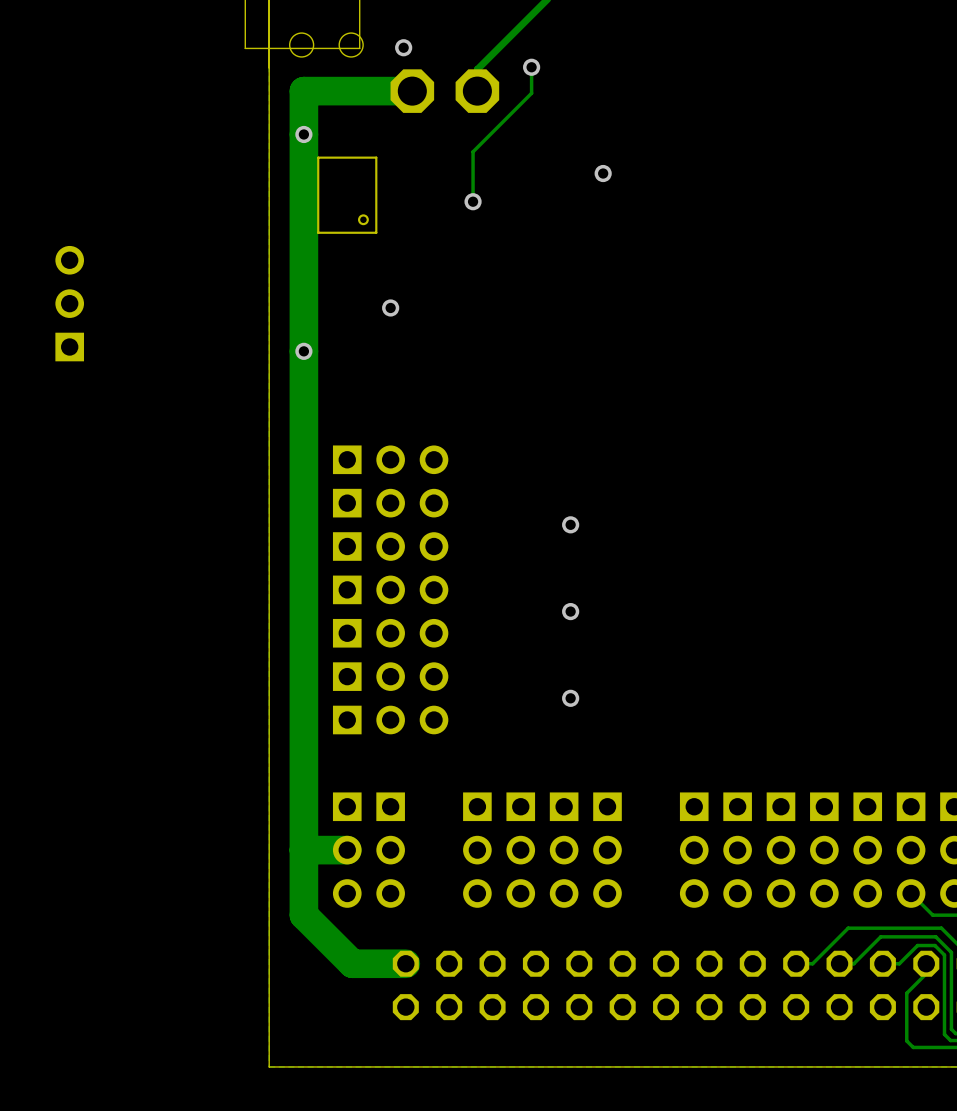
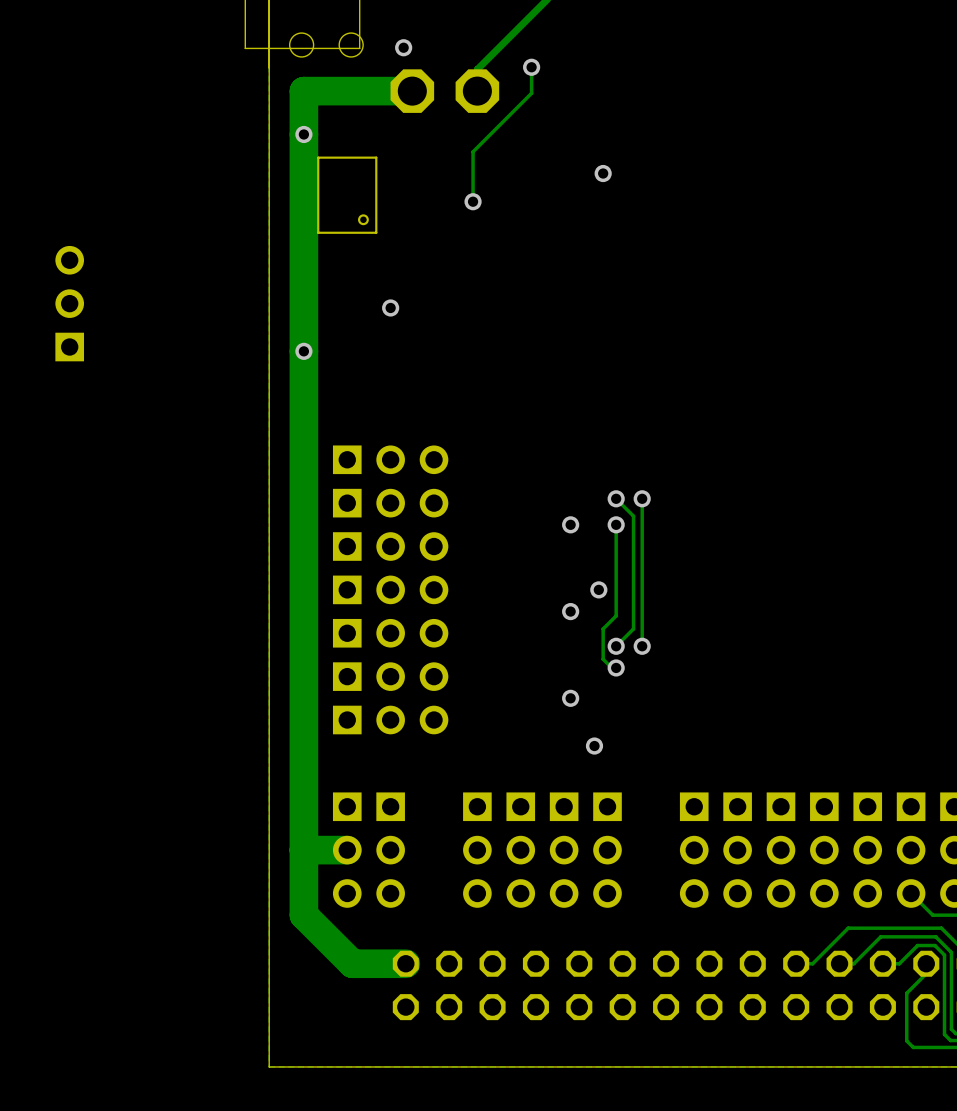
track: none -> (616, 498) (633, 516) (633, 628) (616, 646)
via: none -> (616, 498)
track: none -> (642, 498) (642, 646)
via: none -> (642, 498)
track: none -> (616, 524) (616, 615) (603, 628) (603, 659) (611, 667) (616, 667)
via: none -> (616, 524)
via: none -> (598, 589)
via: none -> (616, 646)
via: none -> (642, 646)
via: none -> (616, 667)
via: none -> (594, 746)

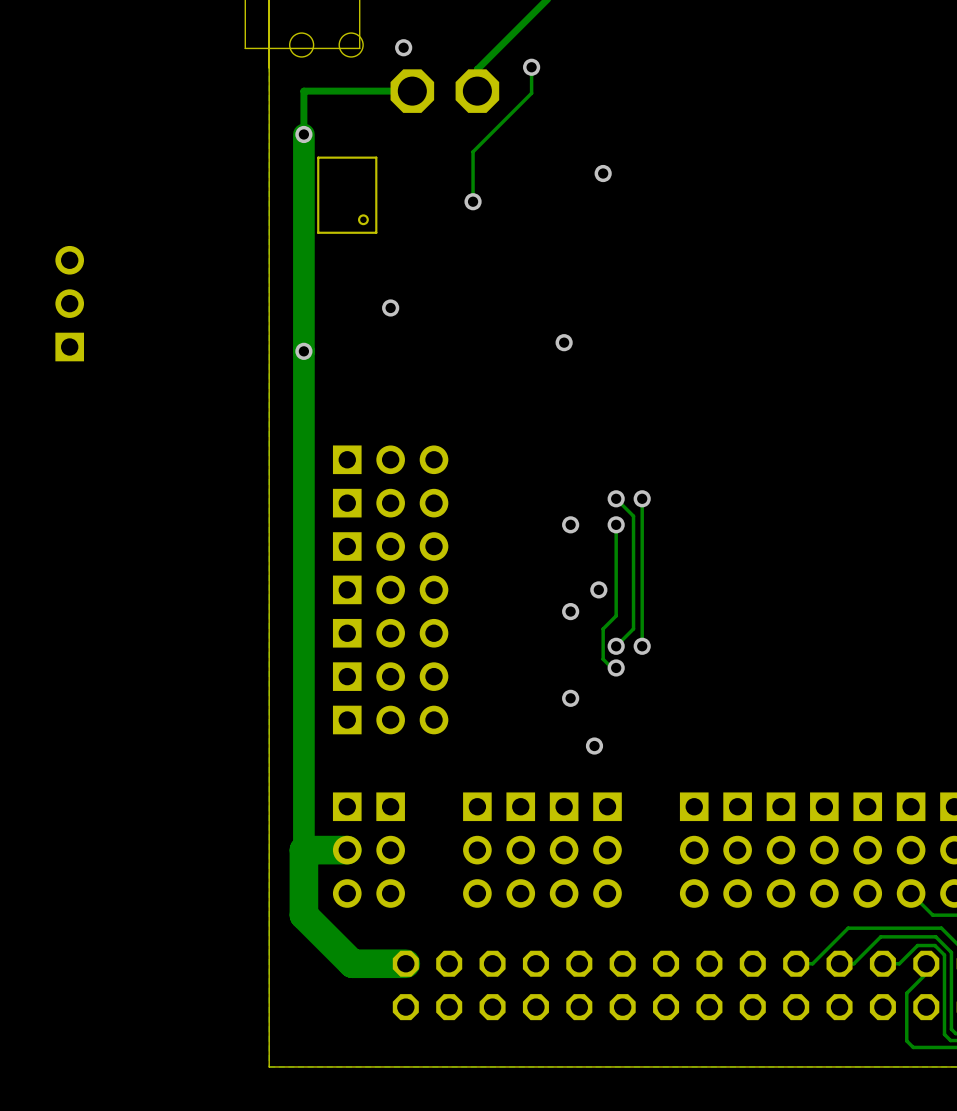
track width: thick (412, 91) (303, 91) (303, 850) -> thin (412, 91) (303, 91) (303, 850)
via: none -> (564, 342)

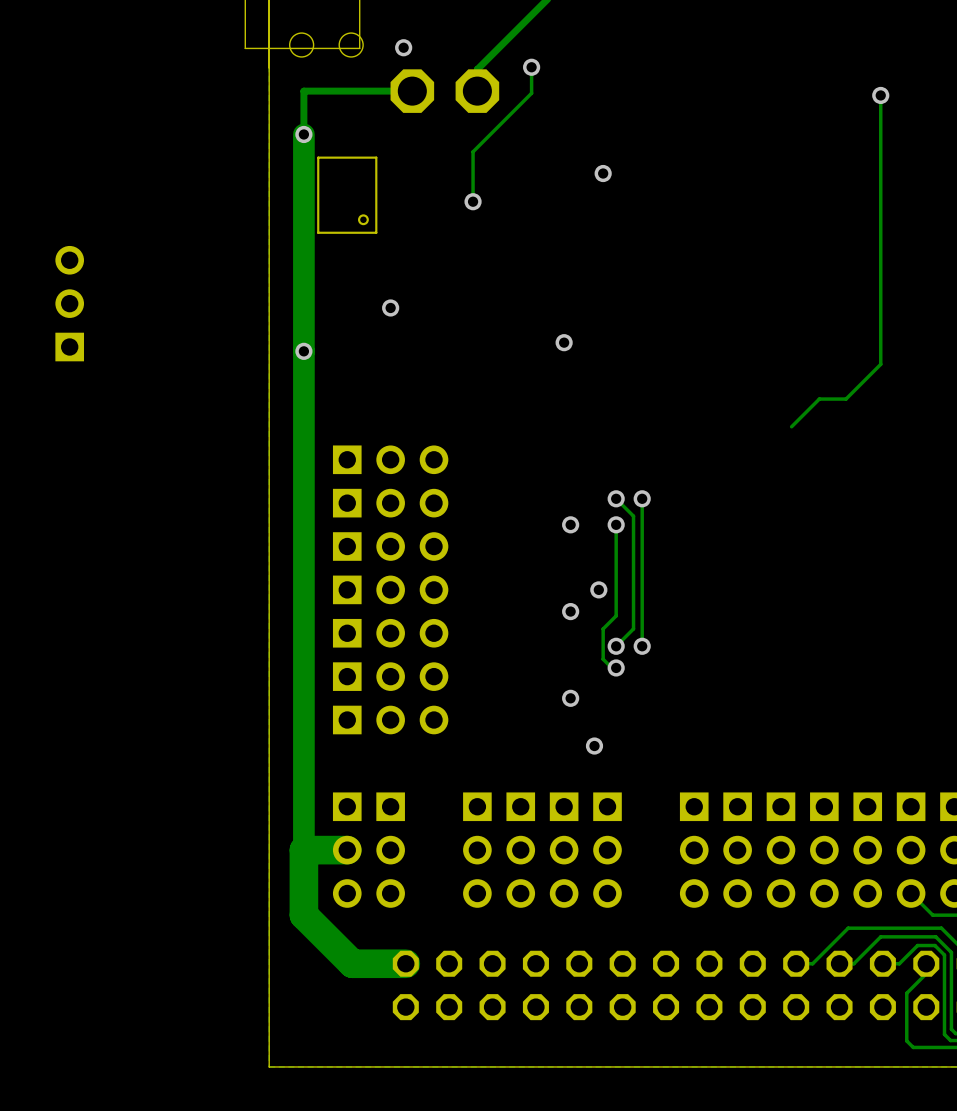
track: none -> (880, 95) (880, 364) (846, 399) (819, 399) (791, 426)
via: none -> (880, 95)

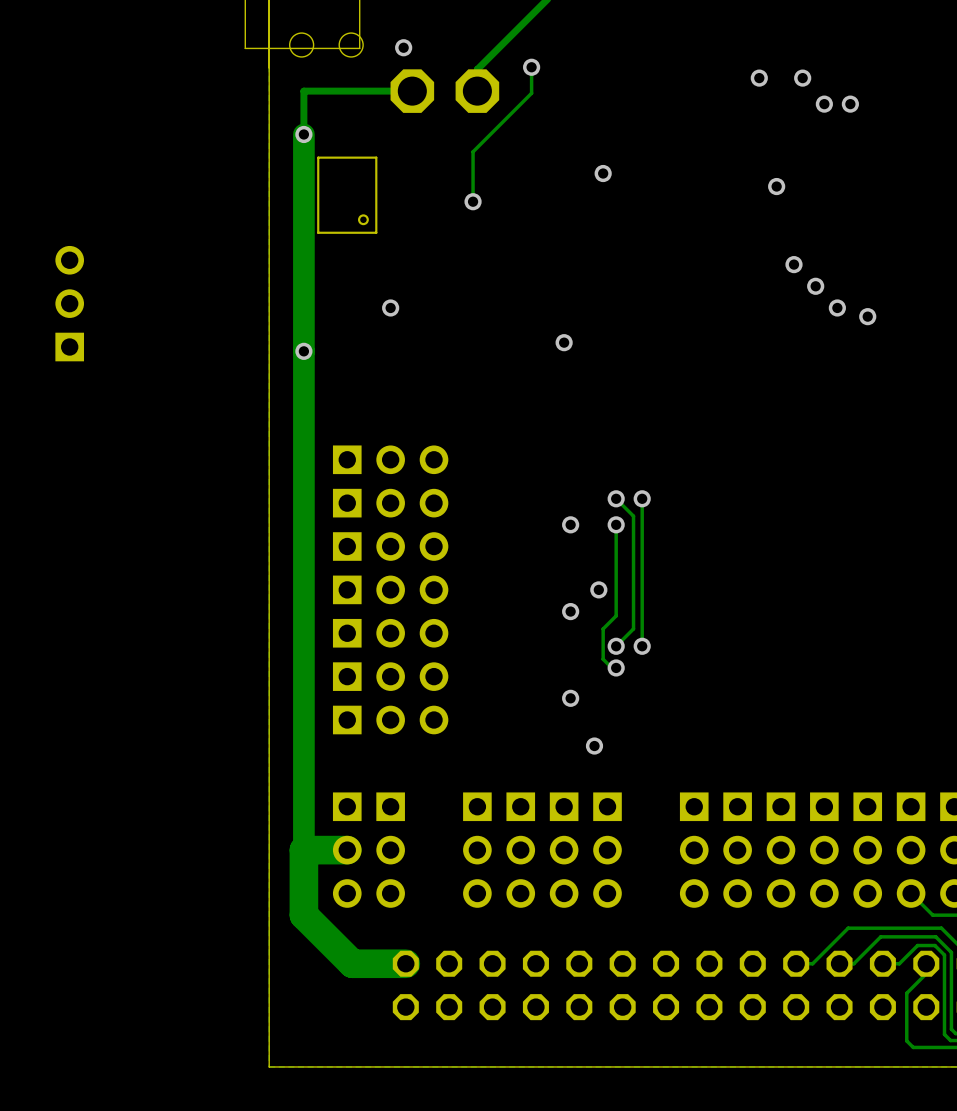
via: none -> (759, 78)
via: none -> (802, 78)
track: (880, 95) (880, 364) (846, 399) (819, 399) (791, 426) -> none
via: (880, 95) -> none
via: none -> (824, 104)
via: none -> (850, 104)
via: none -> (776, 186)
via: none -> (794, 264)
via: none -> (815, 286)
via: none -> (837, 307)
via: none -> (867, 316)

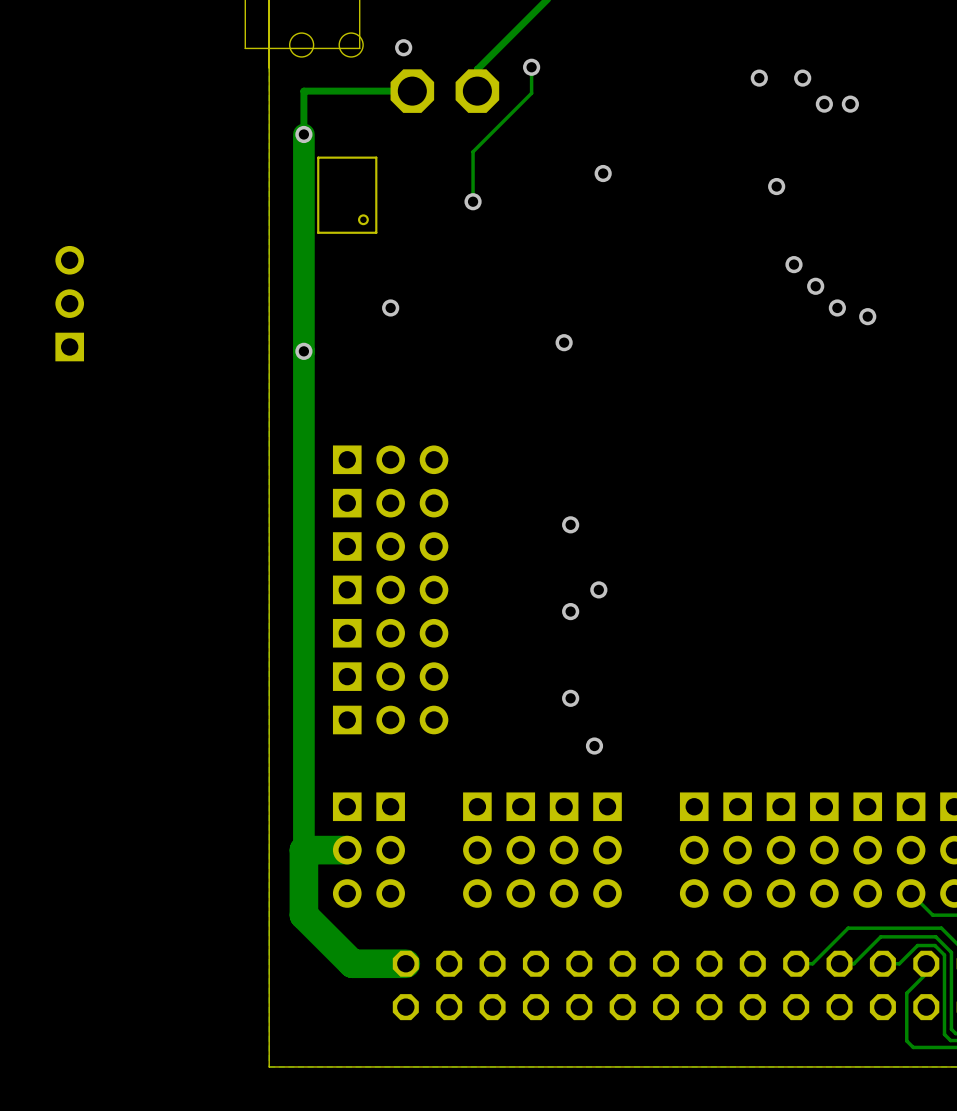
track: (616, 498) (633, 516) (633, 628) (616, 646) -> none
via: (616, 498) -> none
track: (642, 498) (642, 646) -> none
via: (642, 498) -> none
track: (616, 524) (616, 615) (603, 628) (603, 659) (611, 667) (616, 667) -> none
via: (616, 524) -> none
via: (616, 646) -> none
via: (642, 646) -> none
via: (616, 667) -> none

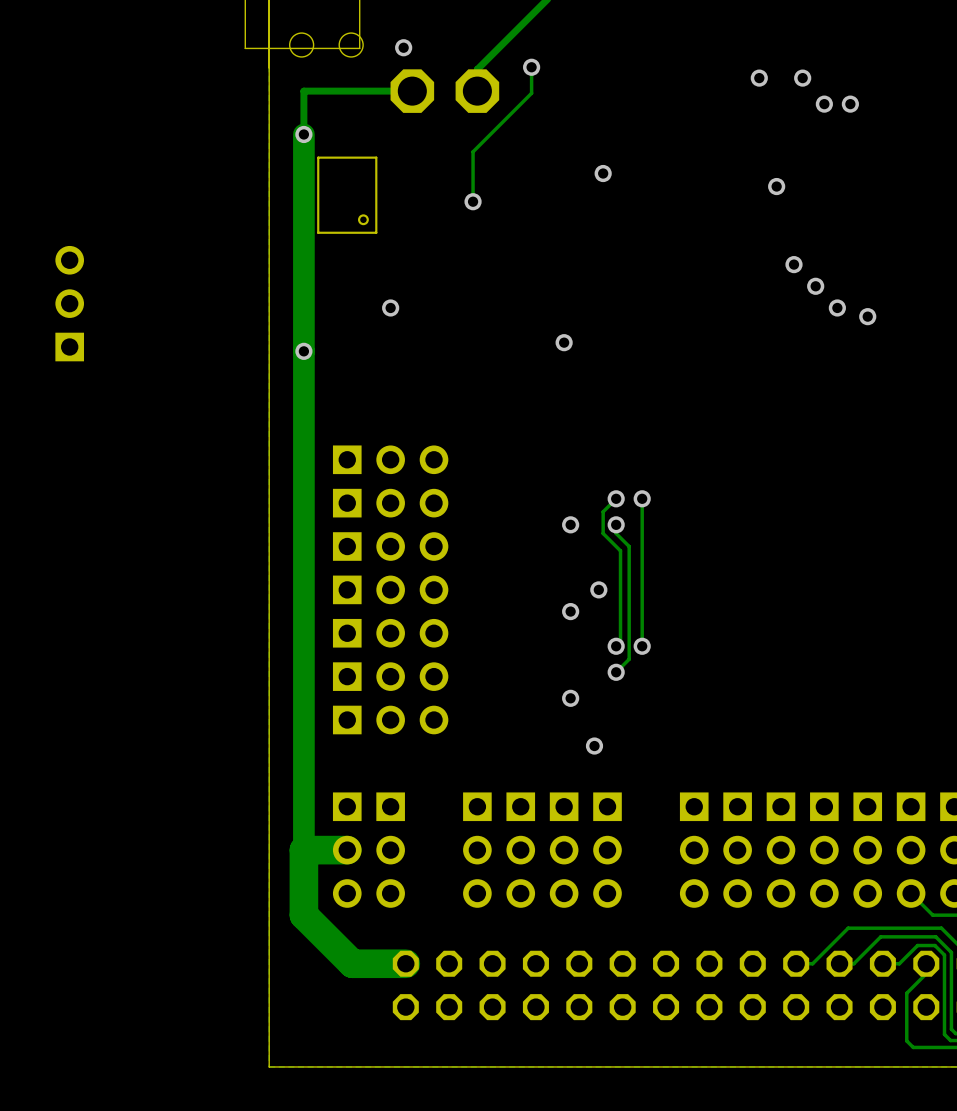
track: none -> (616, 498) (603, 511) (603, 533) (620, 550) (620, 641) (616, 646)
via: none -> (616, 498)
track: none -> (642, 498) (642, 646)
via: none -> (642, 498)
track: none -> (616, 524) (616, 533) (629, 546) (629, 659) (616, 672)
via: none -> (616, 524)
via: none -> (616, 646)
via: none -> (642, 646)
via: none -> (616, 672)

